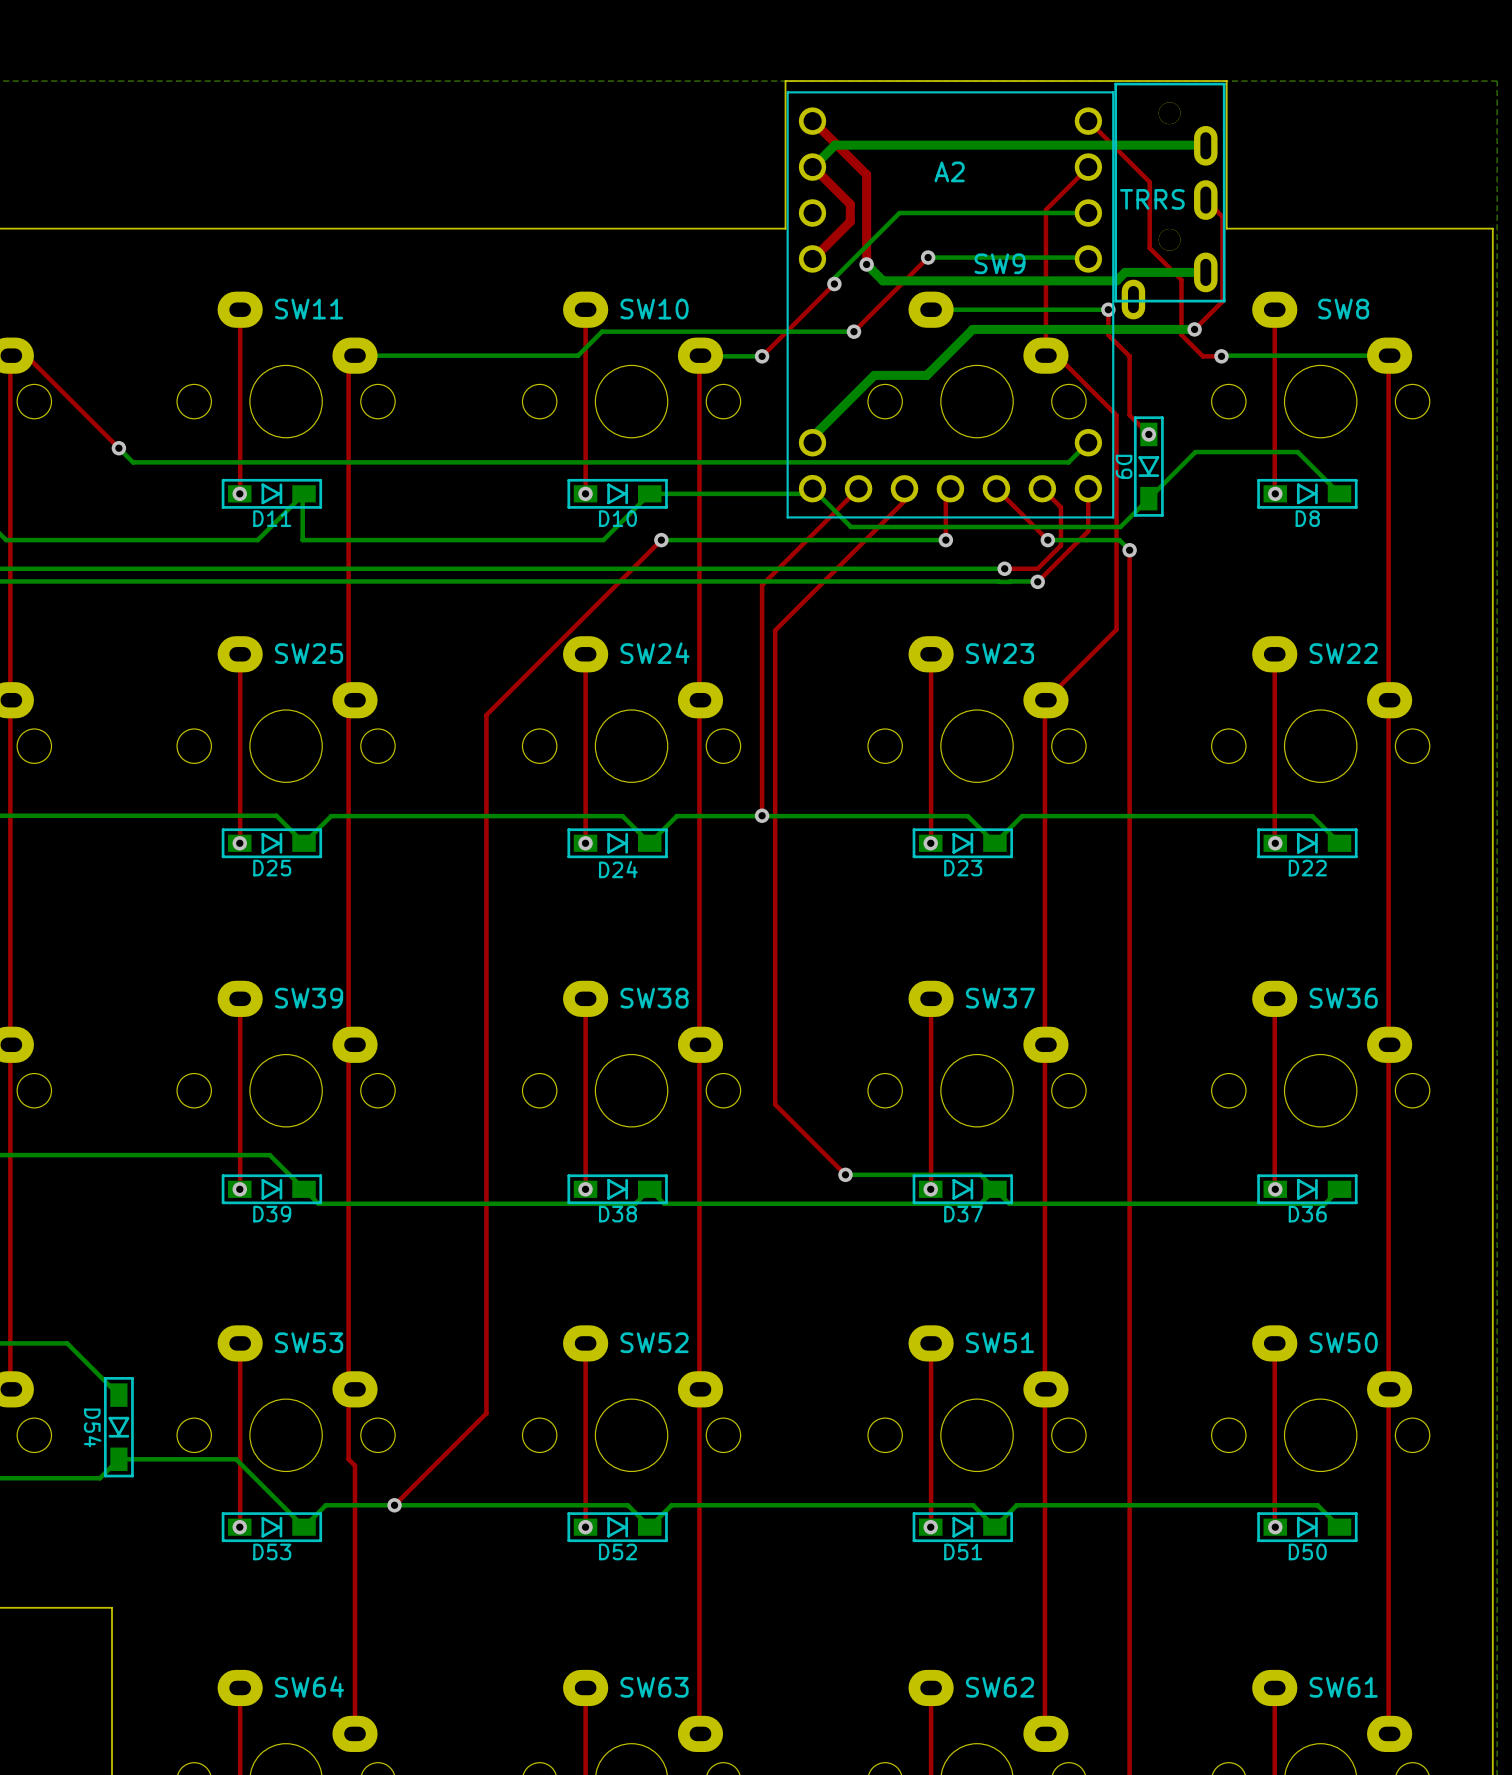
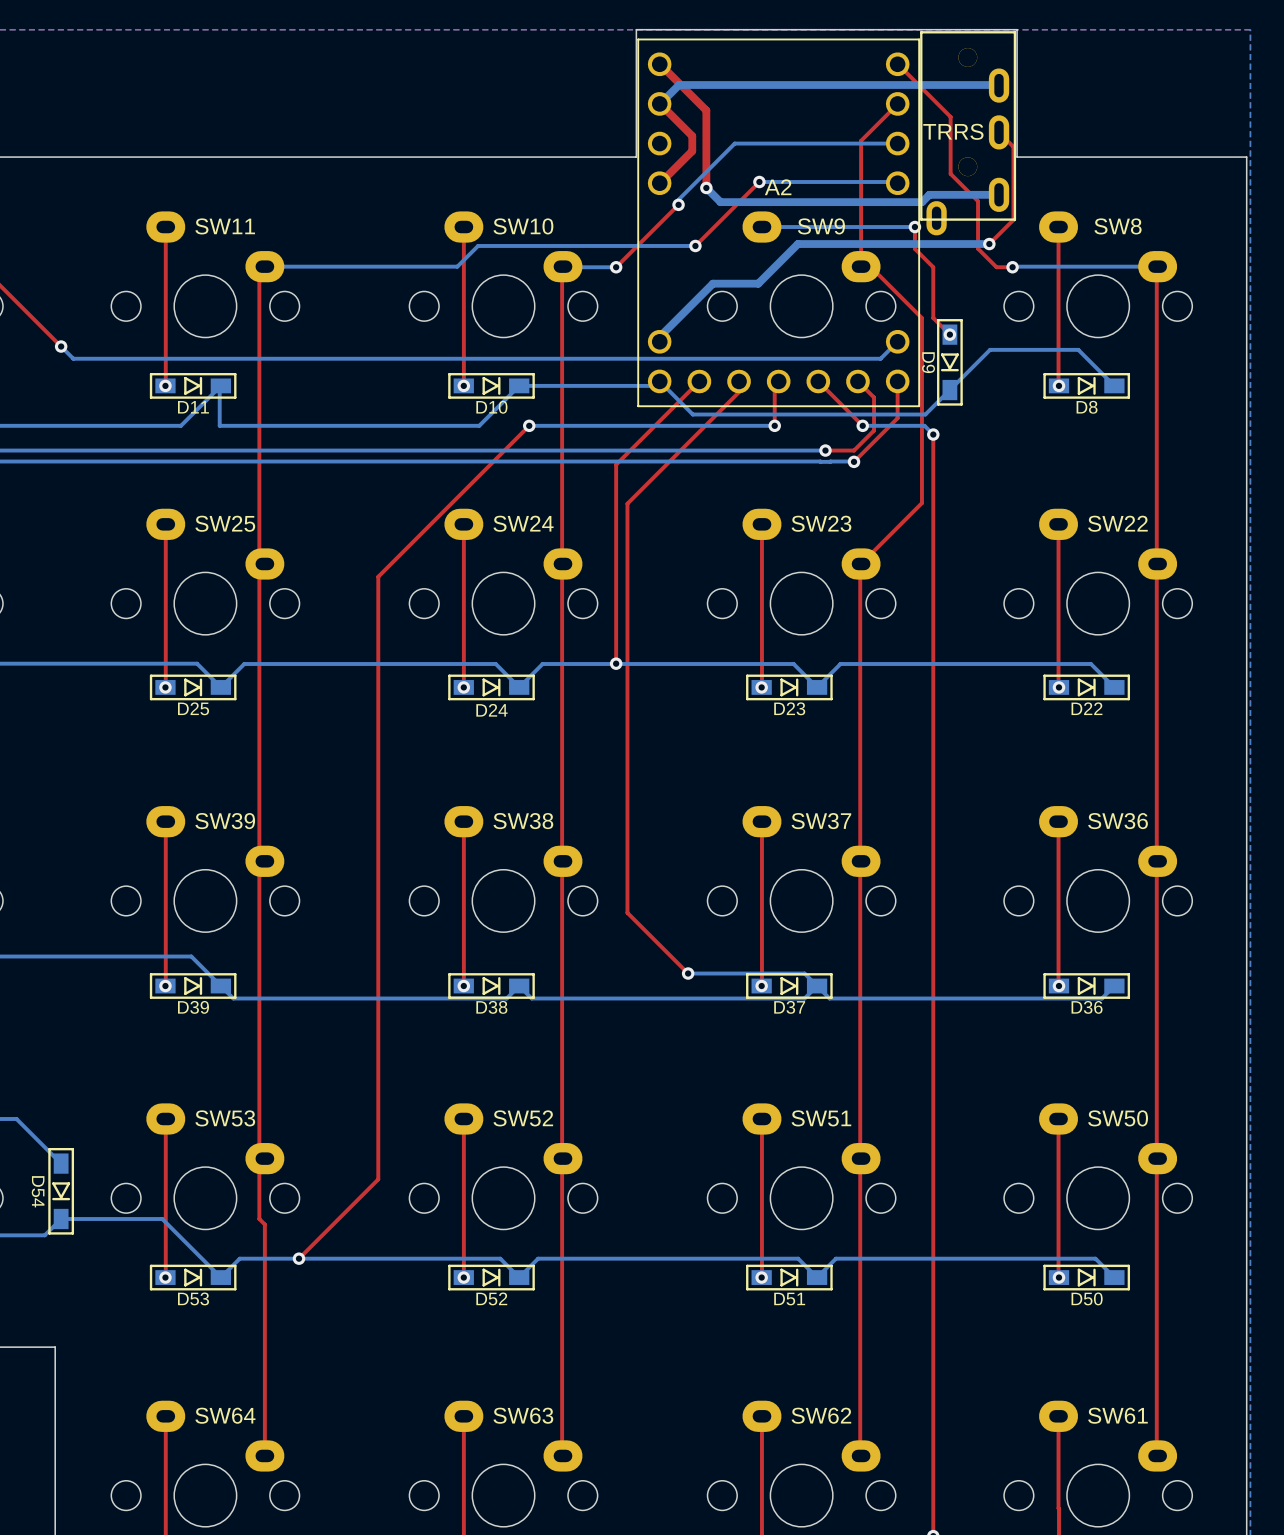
A2 name position: A2 (949, 171) -> A2 (778, 187)
SW9 name position: SW9 (1000, 263) -> SW9 (821, 226)

